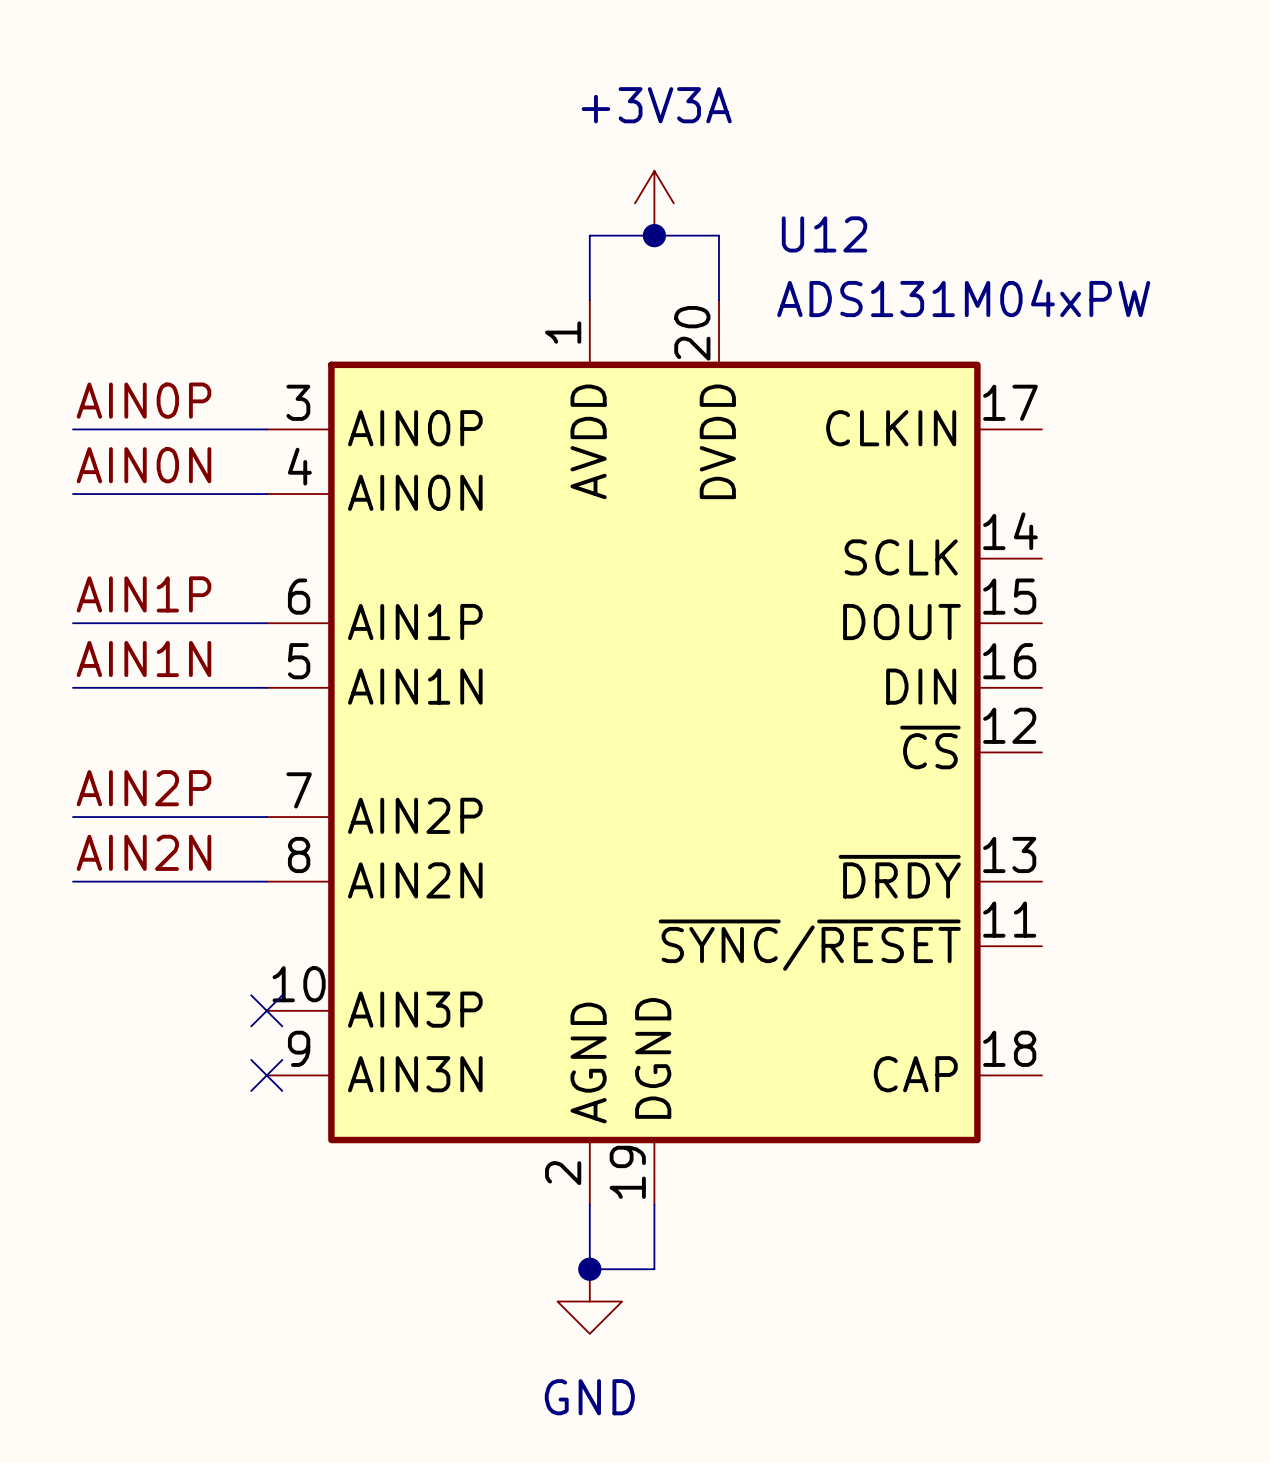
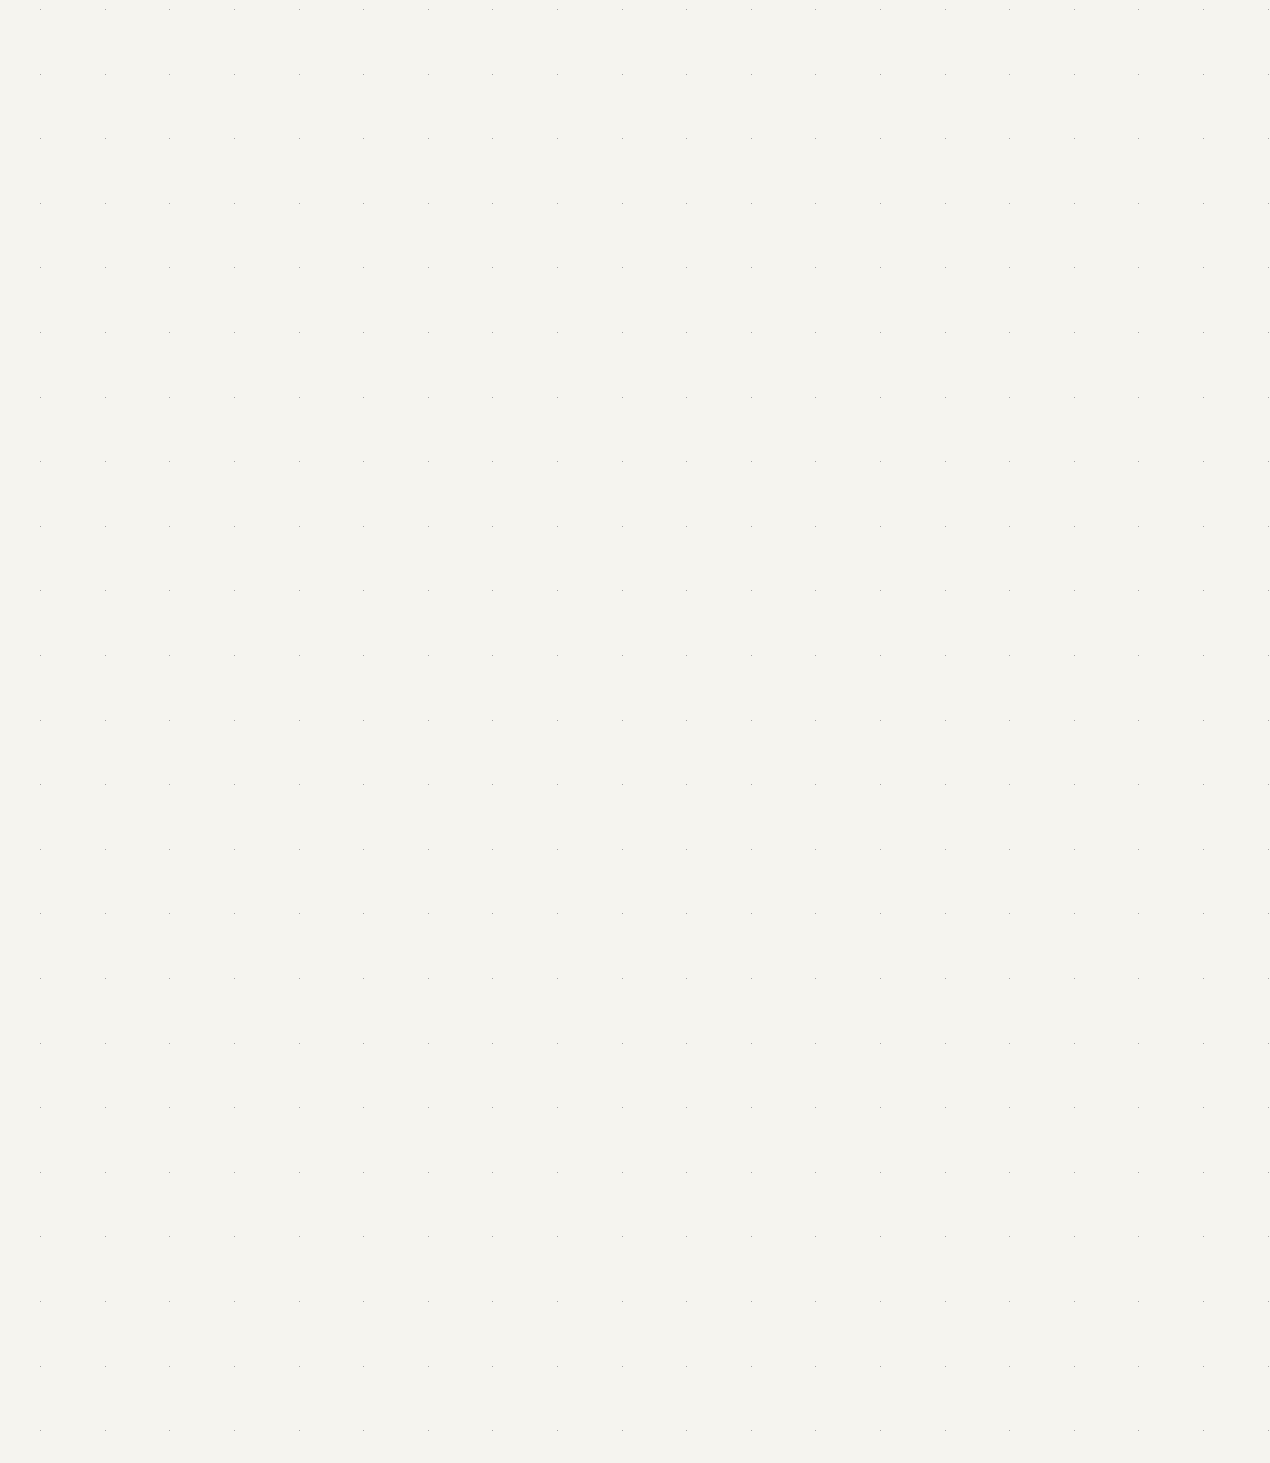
power symbol: +3V3A (654, 203) -> none
junction: (654, 235) -> none
wire: (589, 300) (589, 235) (719, 235) (719, 300) -> none
label: AIN0P (143, 400) -> none
wire: (73, 429) (266, 429) -> none
label: AIN0N (143, 465) -> none
wire: (73, 494) (266, 494) -> none
label: AIN1P (143, 594) -> none
wire: (73, 623) (266, 623) -> none
label: AIN1N (143, 659) -> none
wire: (73, 687) (266, 687) -> none
U12: ADS131M04xPW (654, 752) -> none
label: AIN2P (143, 788) -> none
wire: (73, 817) (266, 817) -> none
label: AIN2N (143, 852) -> none
wire: (73, 881) (266, 881) -> none
no-connect mark: (266, 1010) -> none
no-connect mark: (266, 1075) -> none
wire: (589, 1204) (589, 1269) (654, 1269) (654, 1204) -> none
junction: (589, 1269) -> none
power symbol: GND (589, 1301) -> none

